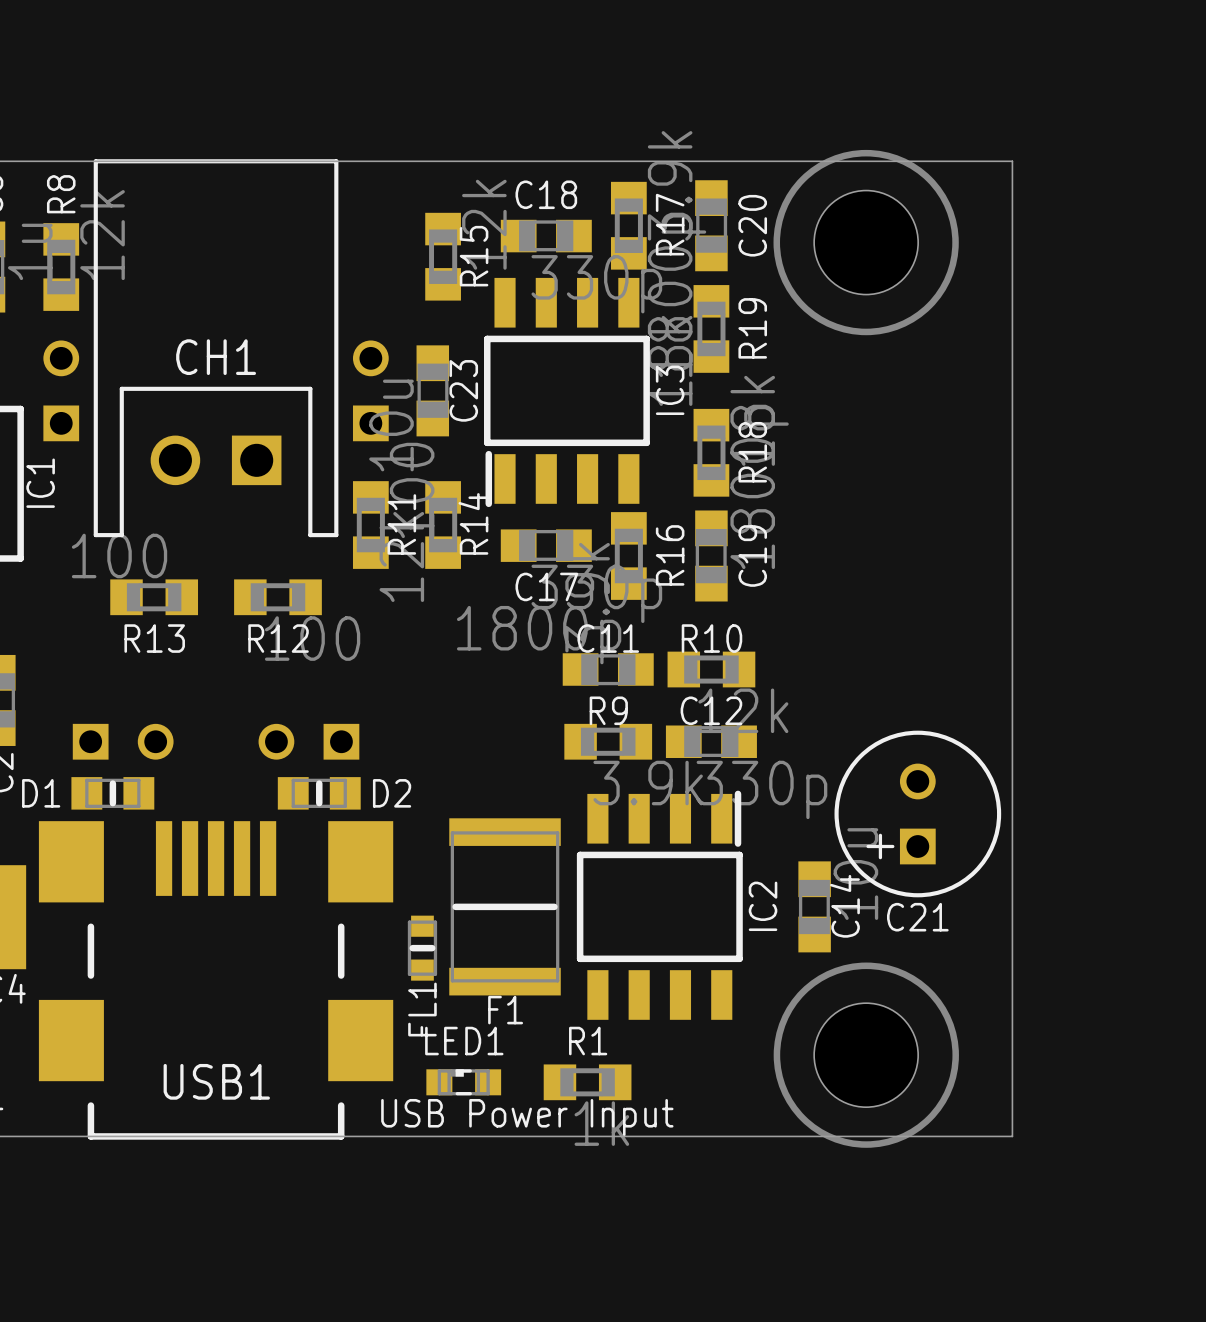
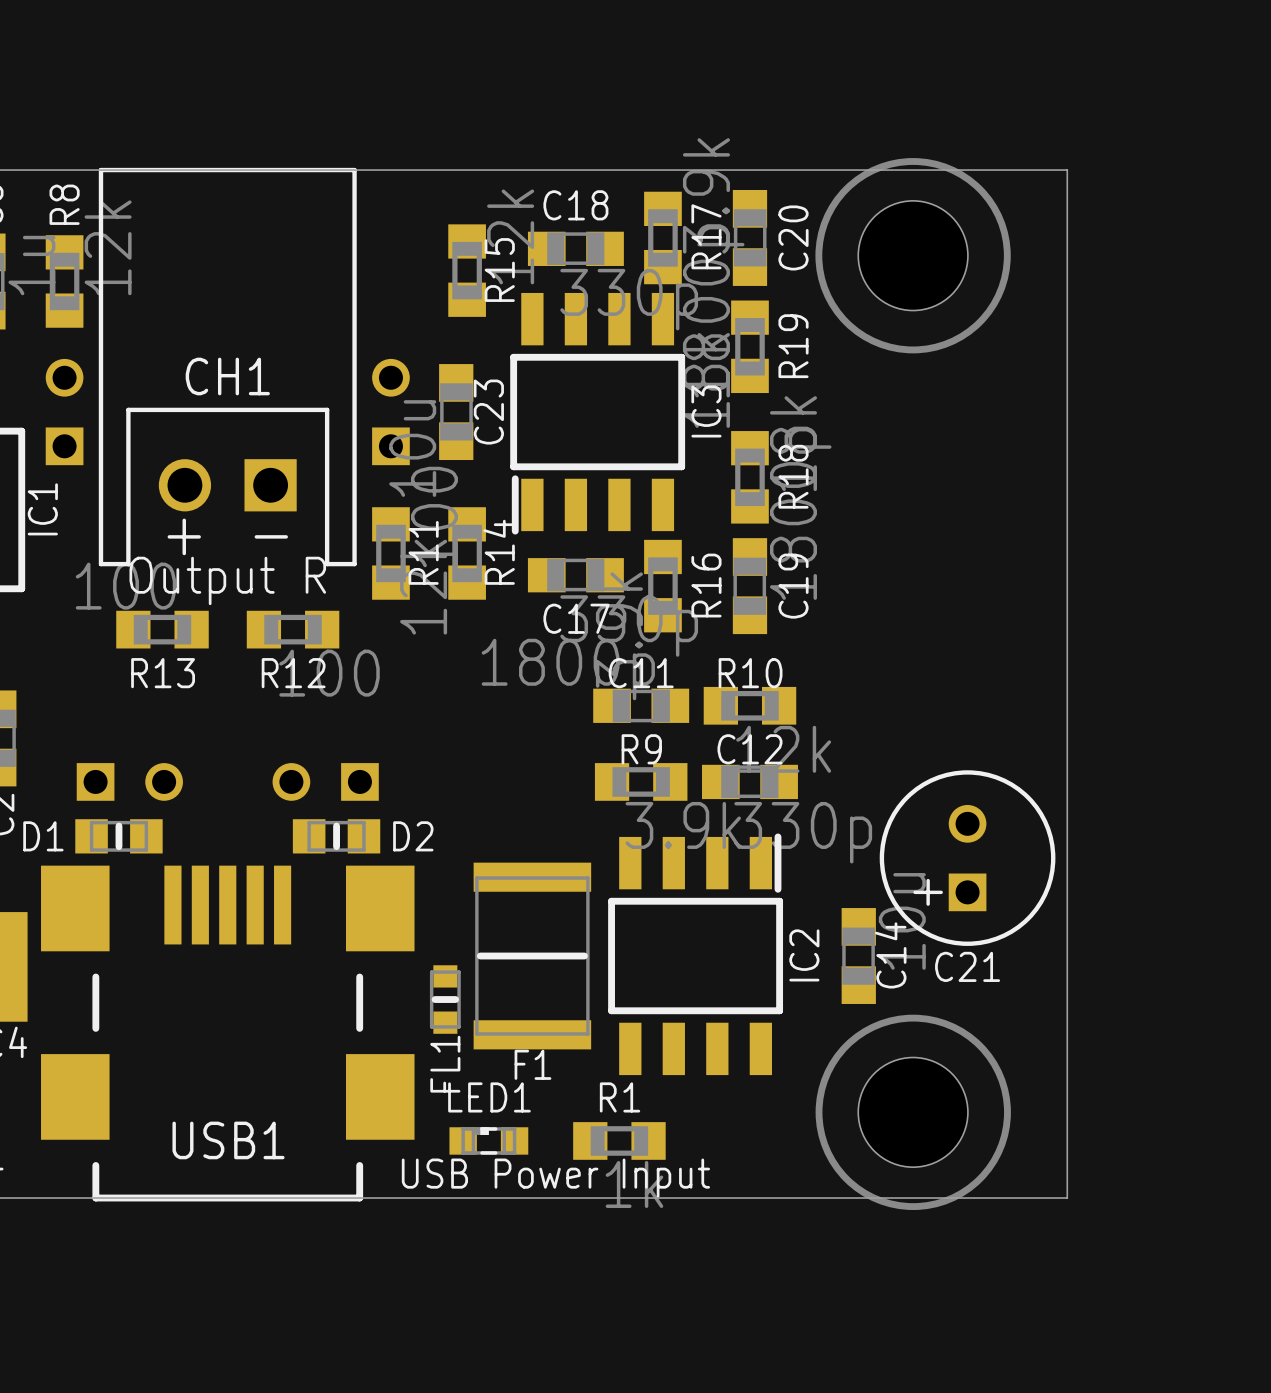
text: none -> + (184, 536)
text: none -> - (271, 536)
text: none -> Output R (227, 580)

